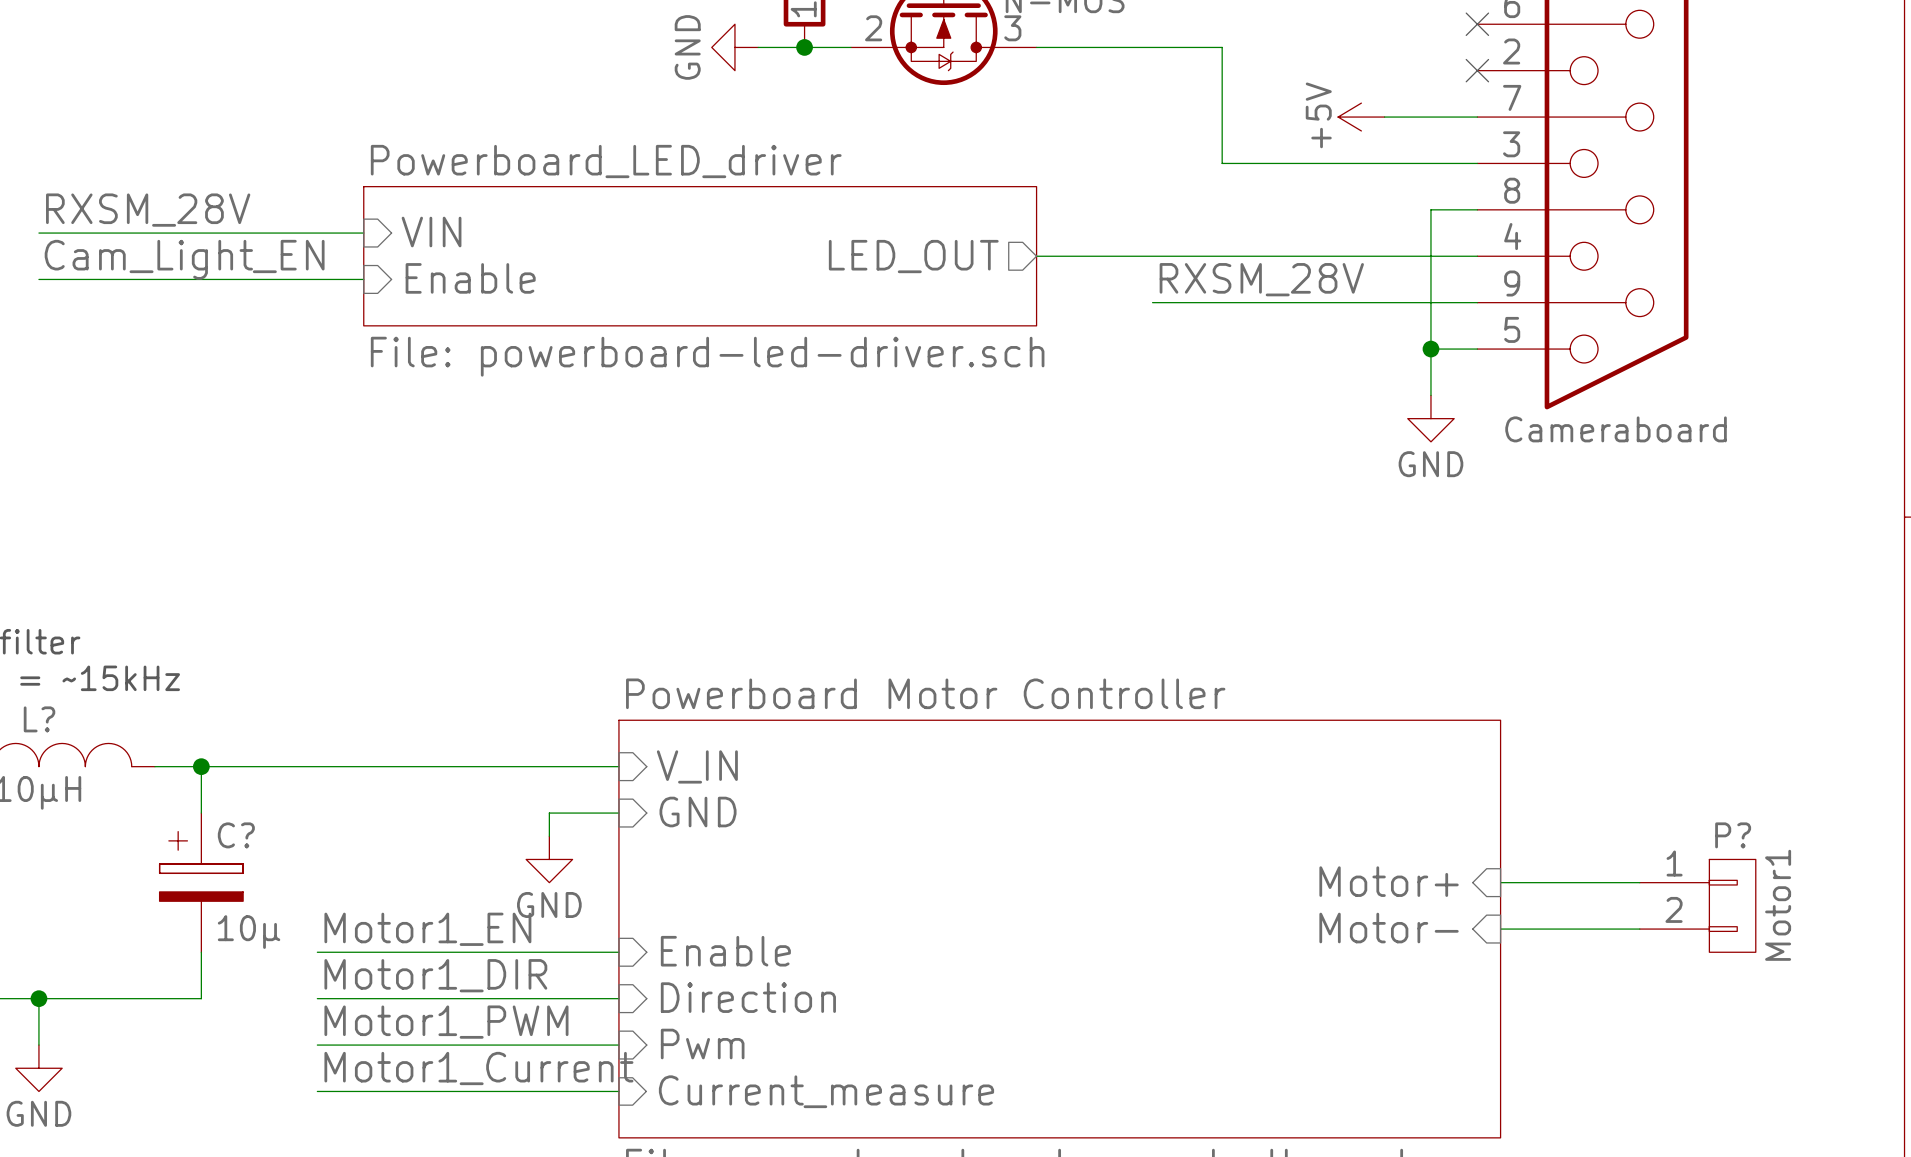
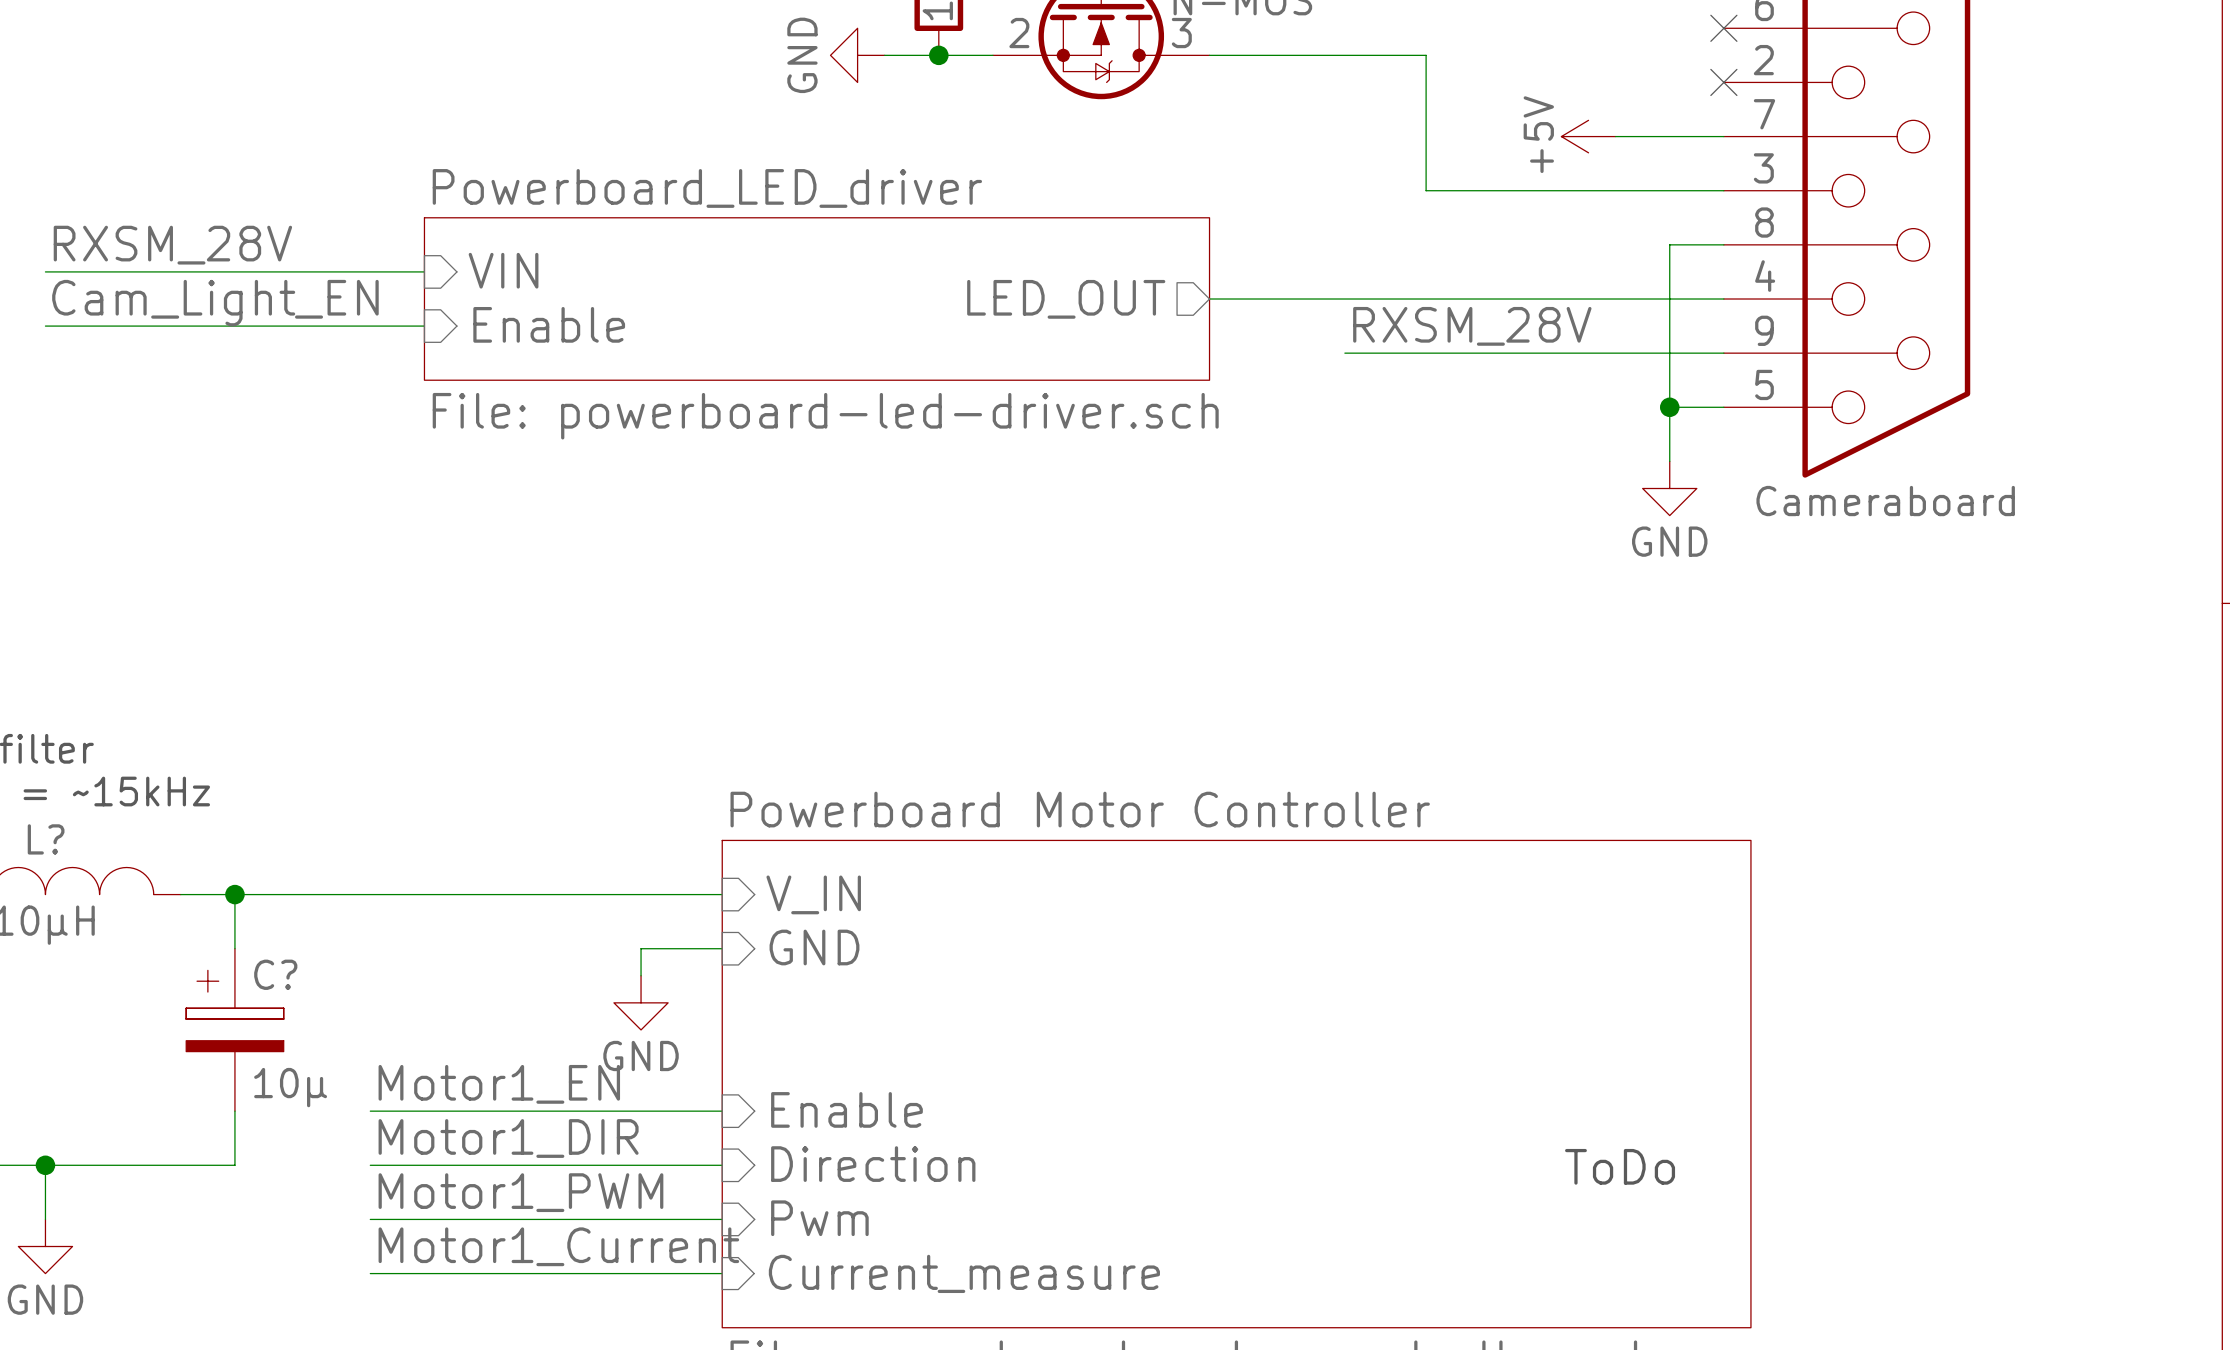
sheet pin: Motor+ (1389, 881) -> none
wire: (1500, 882) (1639, 882) -> none
P?: Motor1 (1697, 905) -> none
sheet pin: Motor- (1389, 928) -> none
wire: (1500, 929) (1639, 929) -> none
text: none -> ToDo (1620, 1166)

